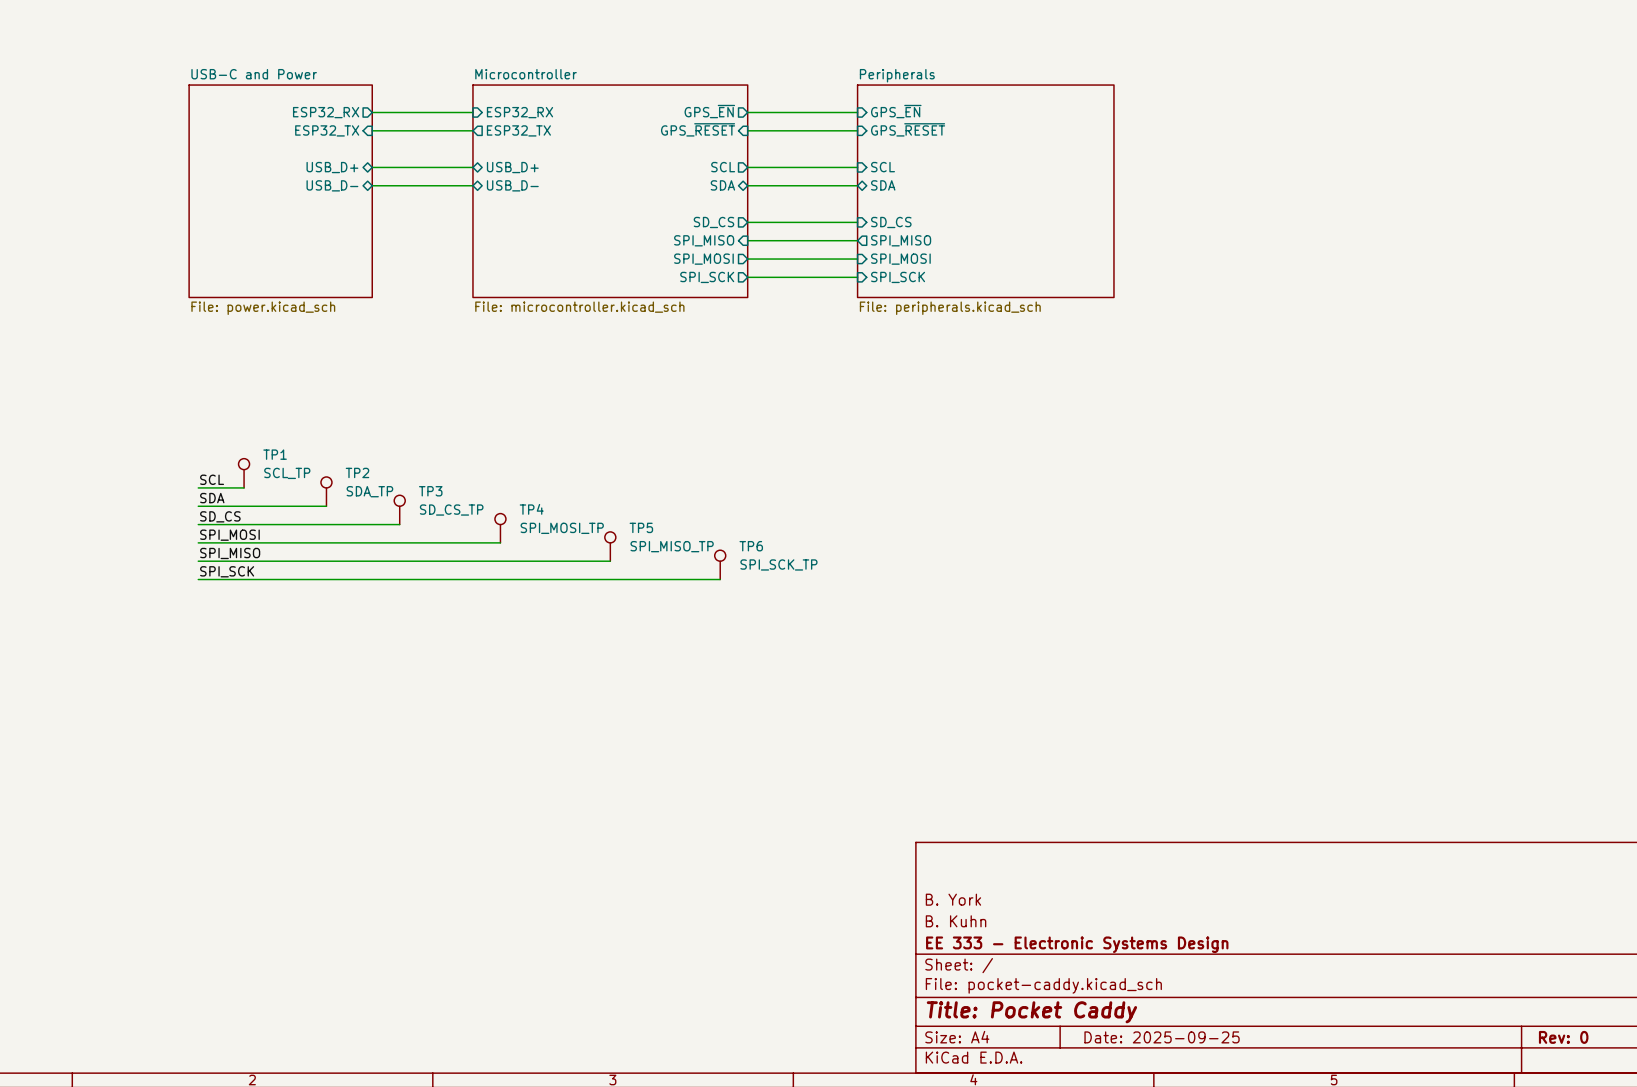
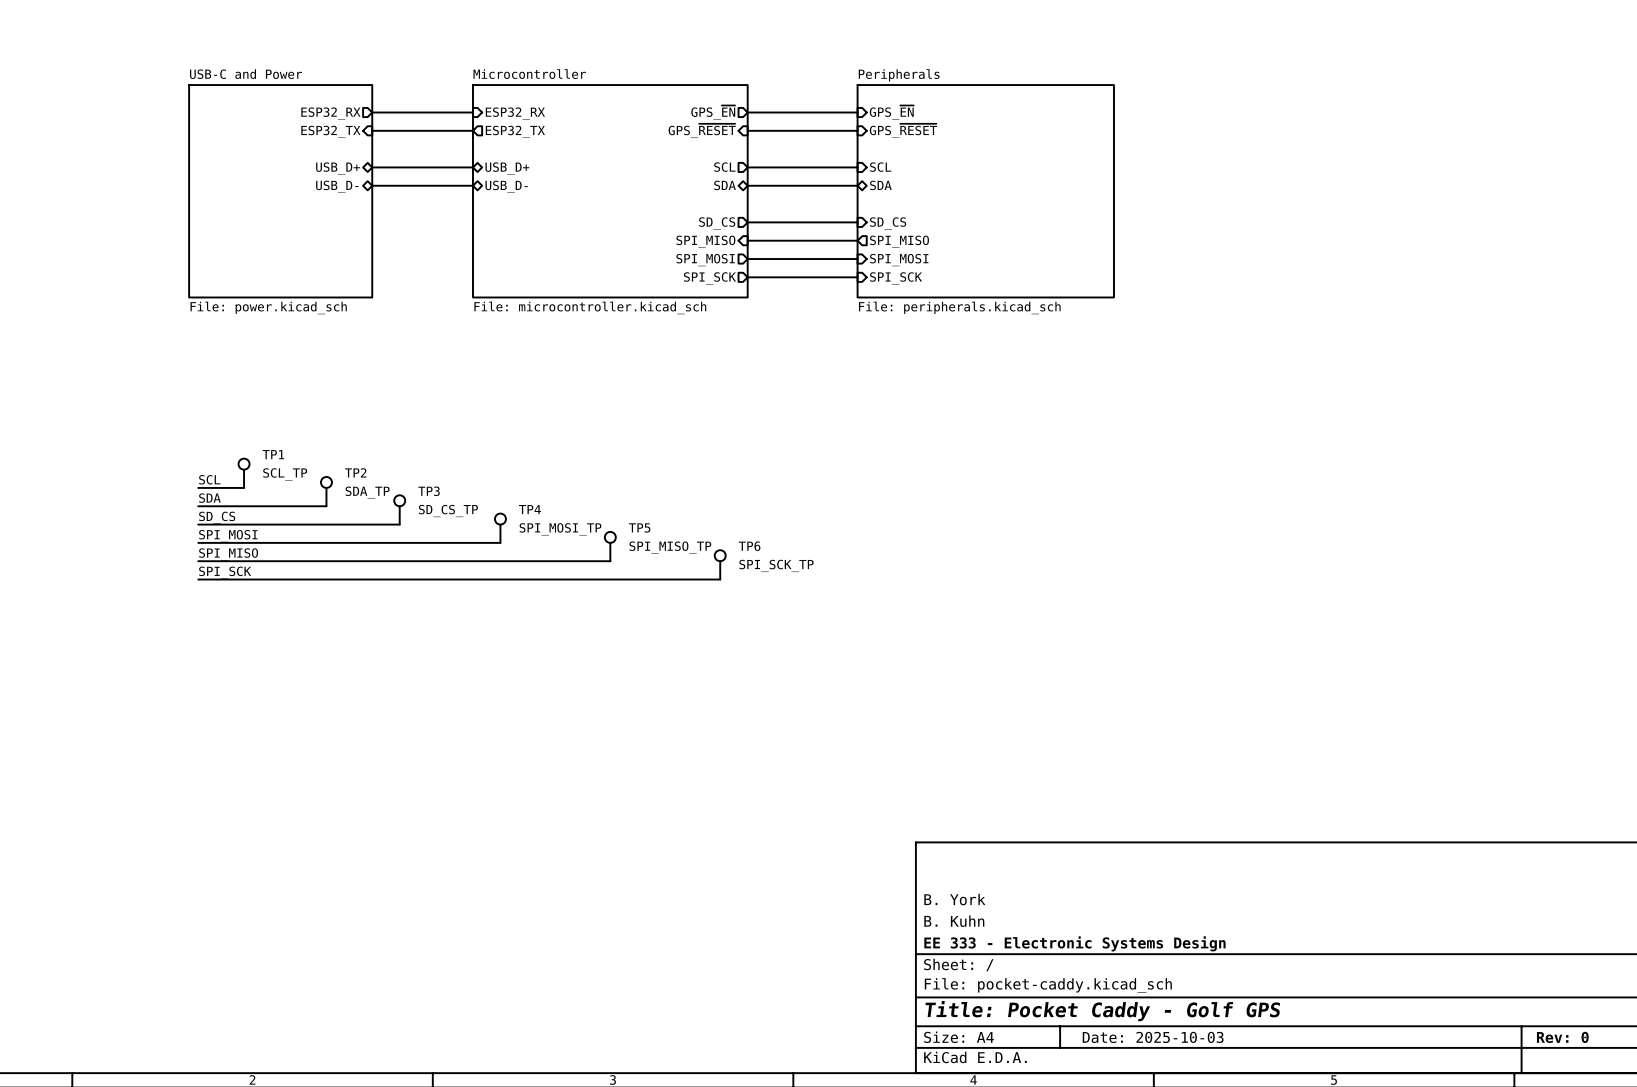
title block: Title: Pocket Caddy (1031, 1012) -> Title: Pocket Caddy - Golf GPS (1102, 1011)
title block: Date: 2025-09-25 (1162, 1037) -> Date: 2025-10-03 (1153, 1037)

